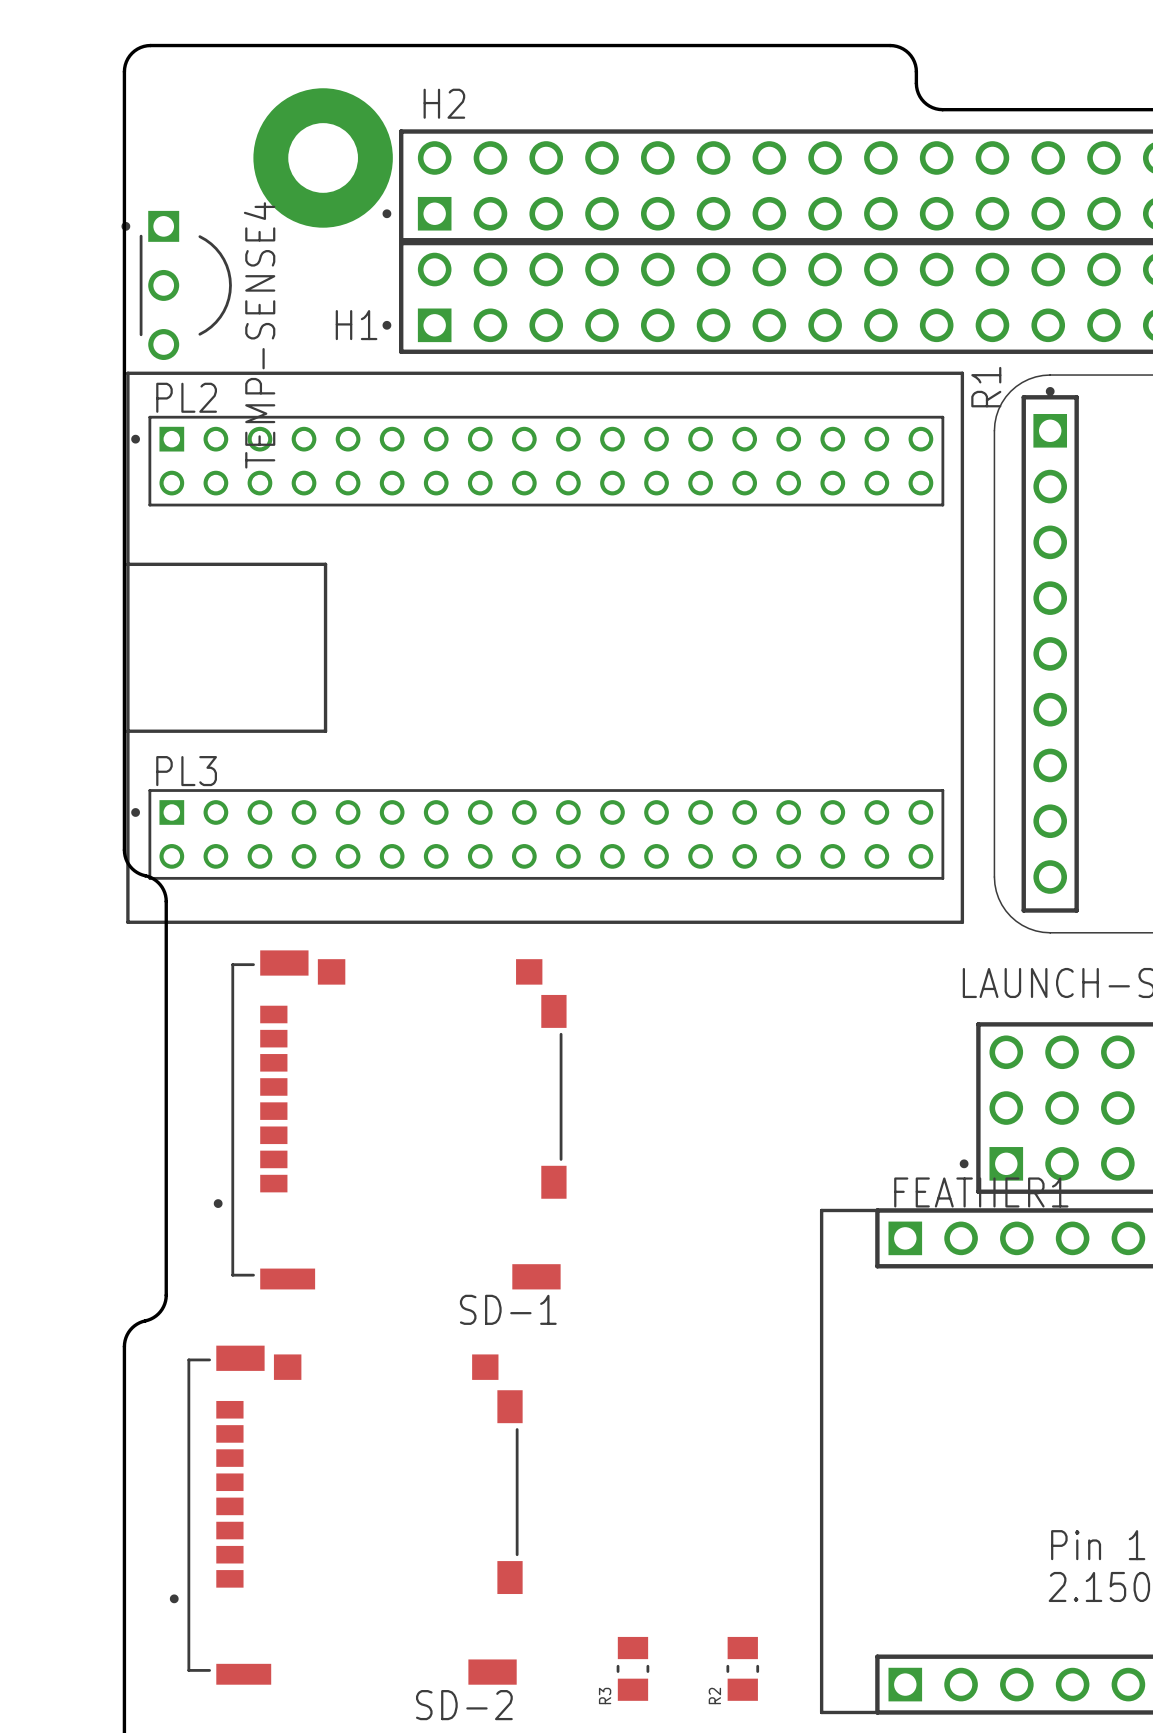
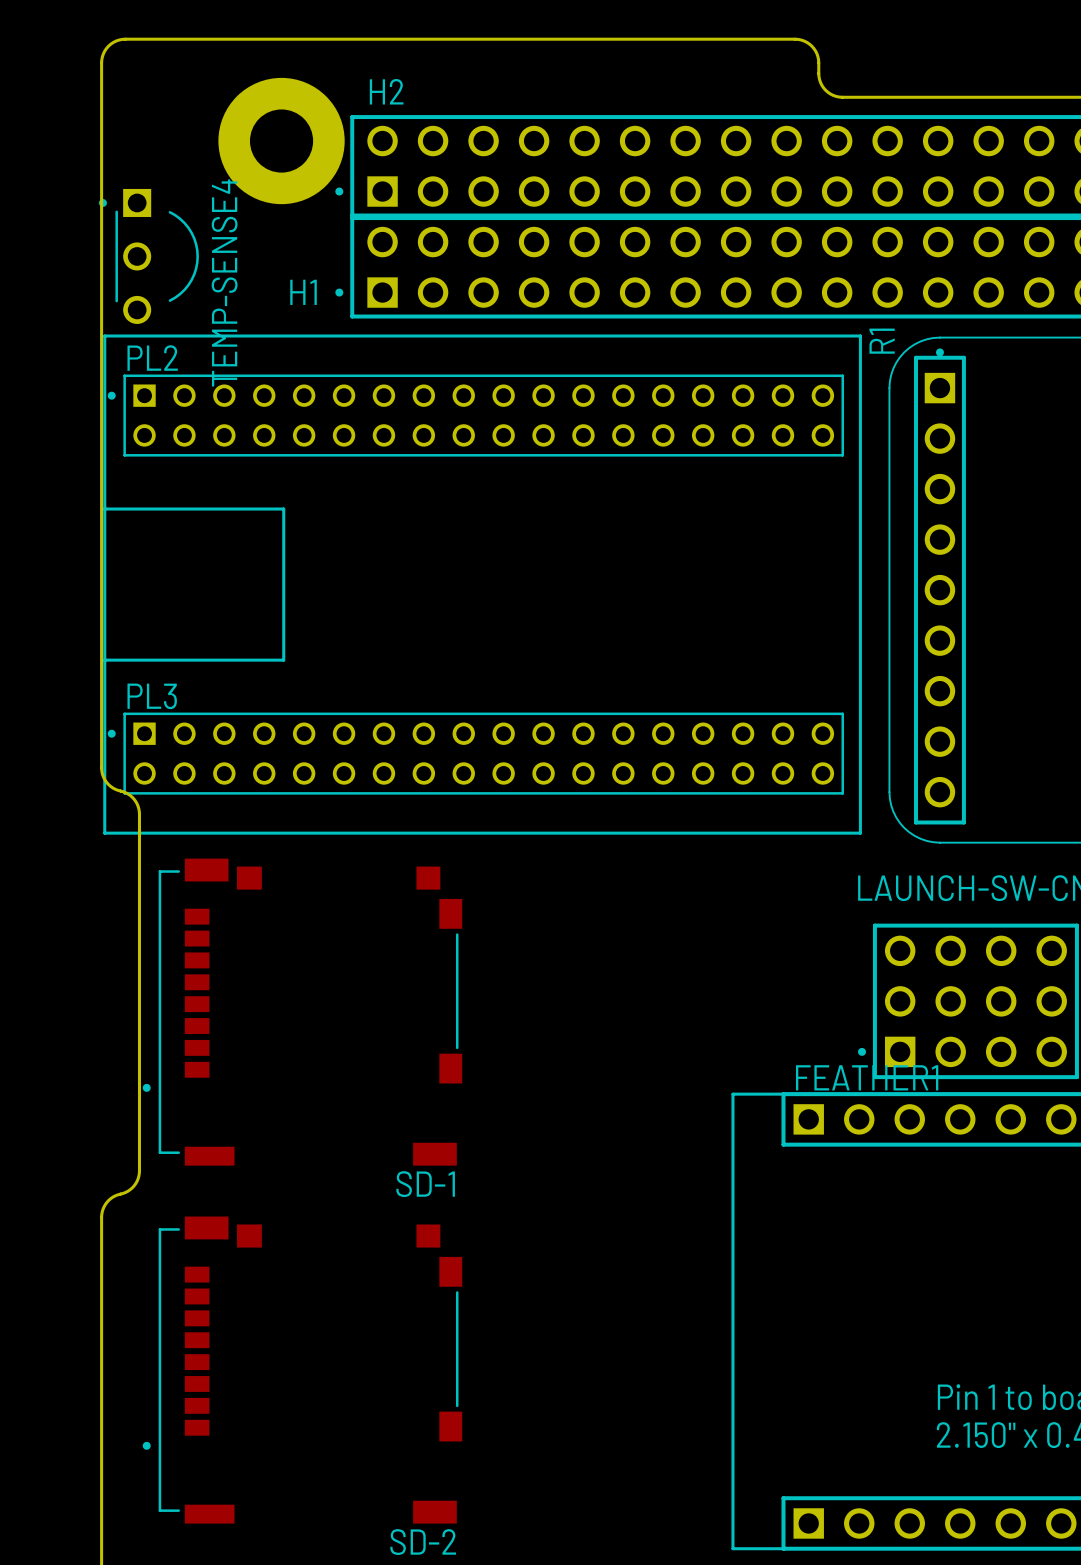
SD-1 position: (390, 1119) -> (302, 1012)
R3: (632, 1668) -> none
R2: (742, 1668) -> none

